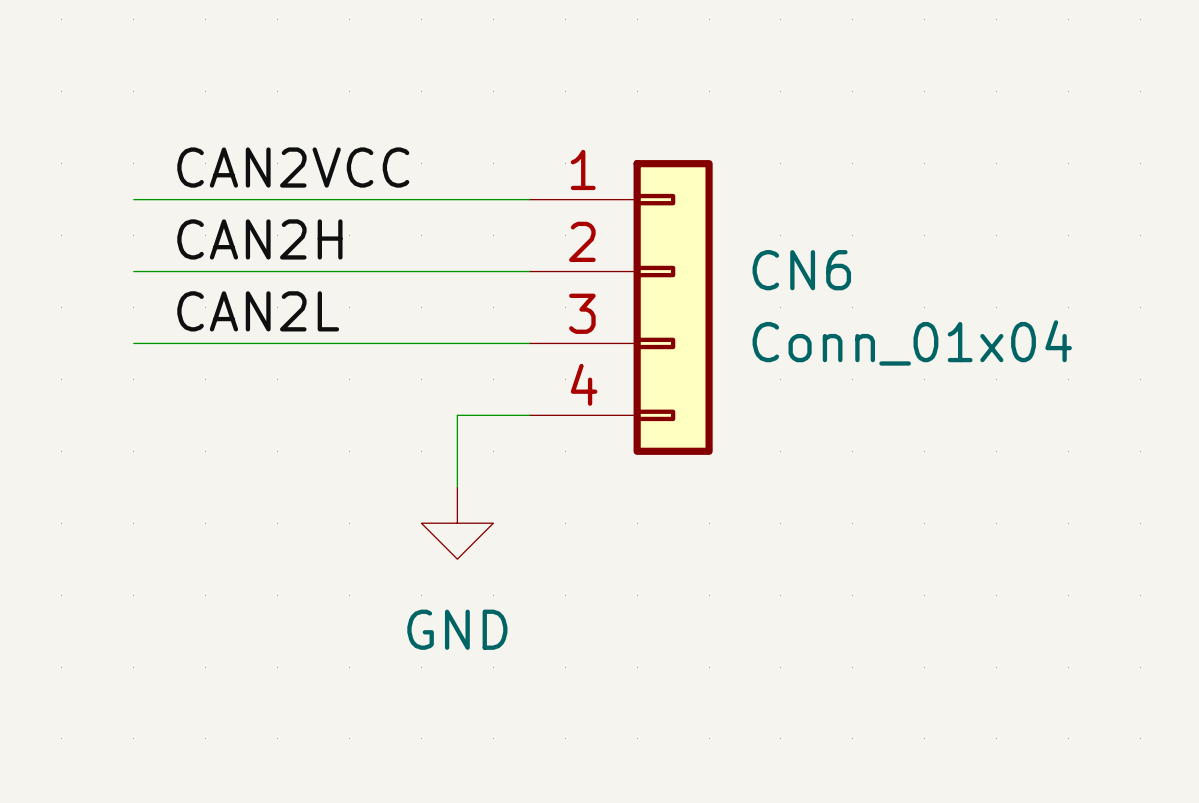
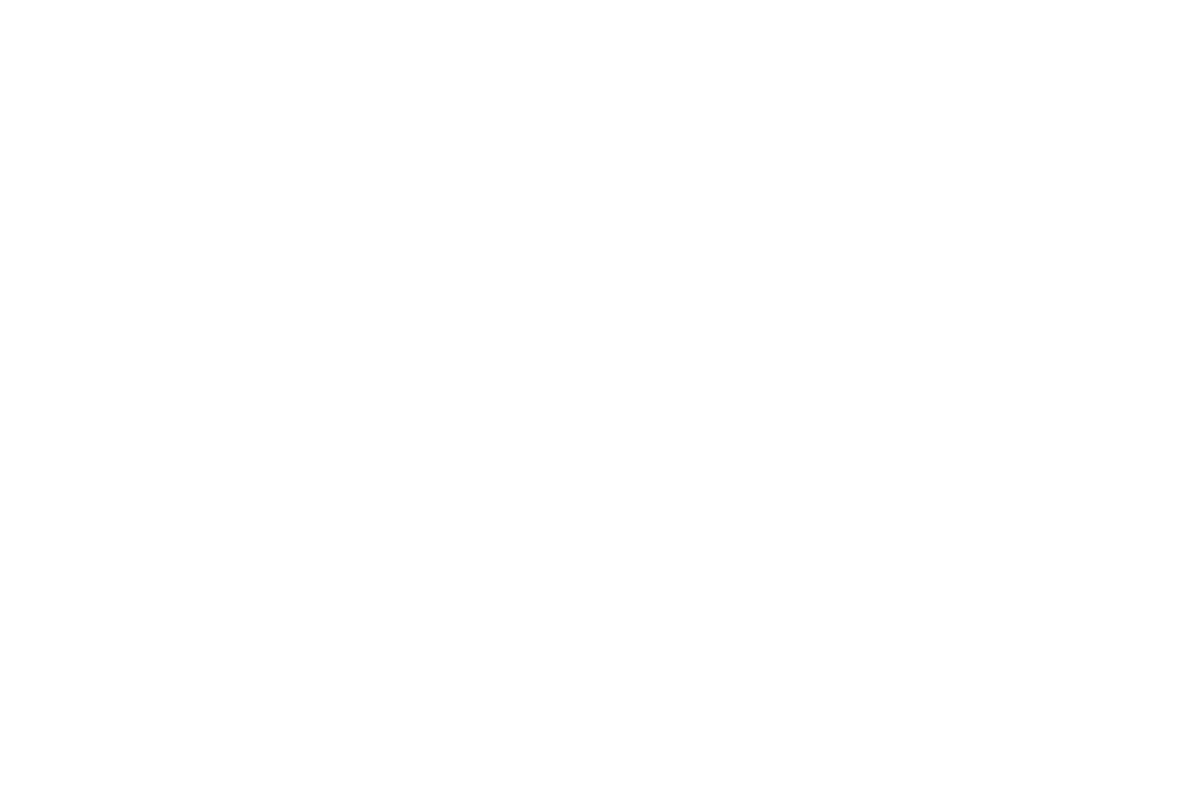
label: CAN2VCC (293, 167) -> none
wire: (133, 199) (529, 199) -> none
label: CAN2H (259, 239) -> none
wire: (133, 271) (529, 271) -> none
CN6: Conn_01x04 (620, 307) -> none
label: CAN2L (258, 311) -> none
wire: (133, 343) (529, 343) -> none
wire: (529, 415) (457, 415) (457, 487) -> none
power symbol: GND (457, 523) -> none

